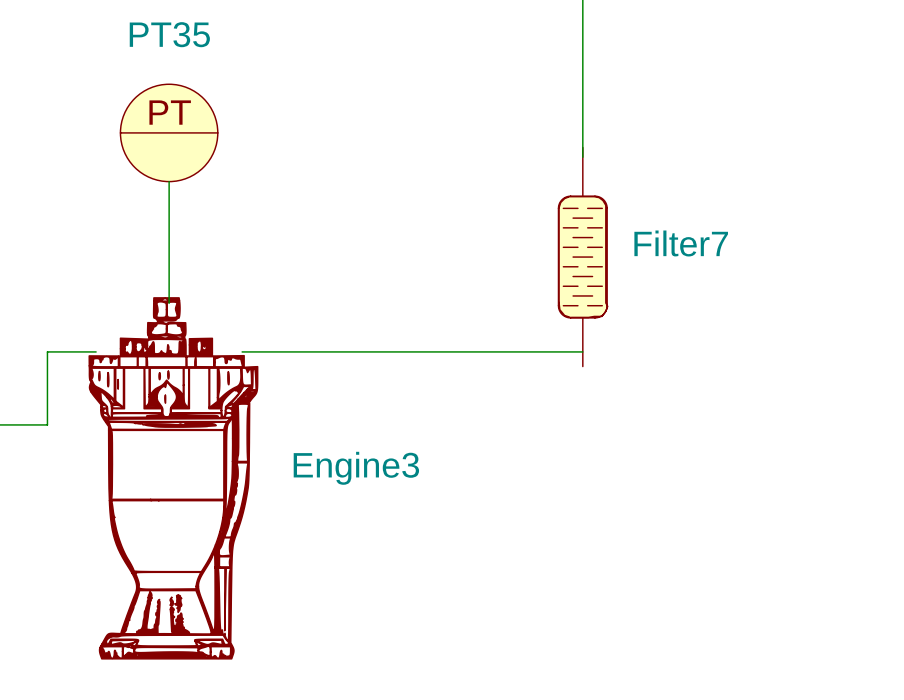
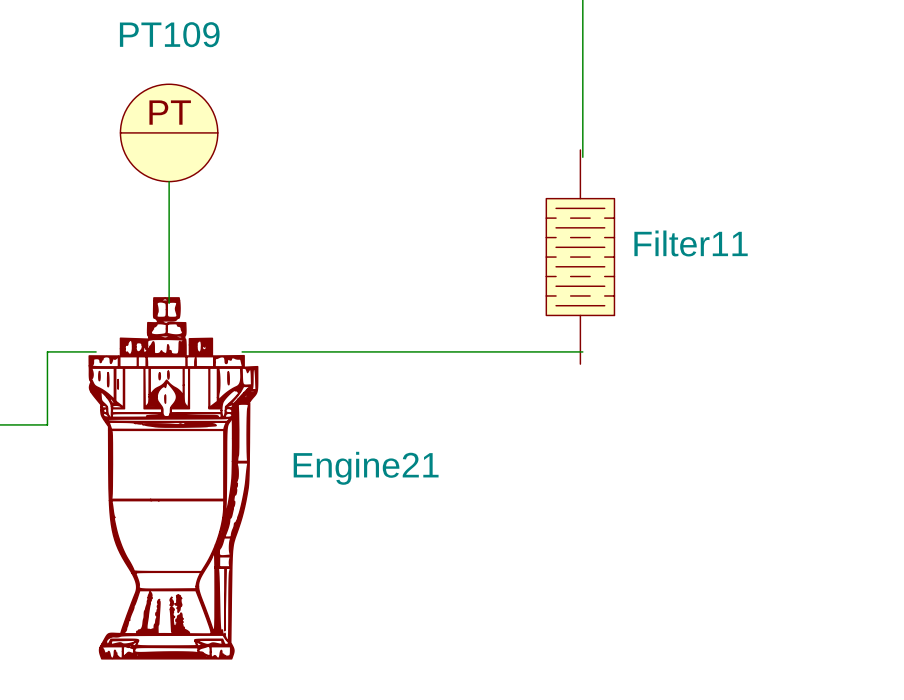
PT35 name: PT35 (169, 34) -> PT109 (169, 34)
Filter11: none -> (580, 257)
Filter7: (583, 257) -> none
Engine3 name: Engine3 (356, 468) -> Engine21 (366, 468)

